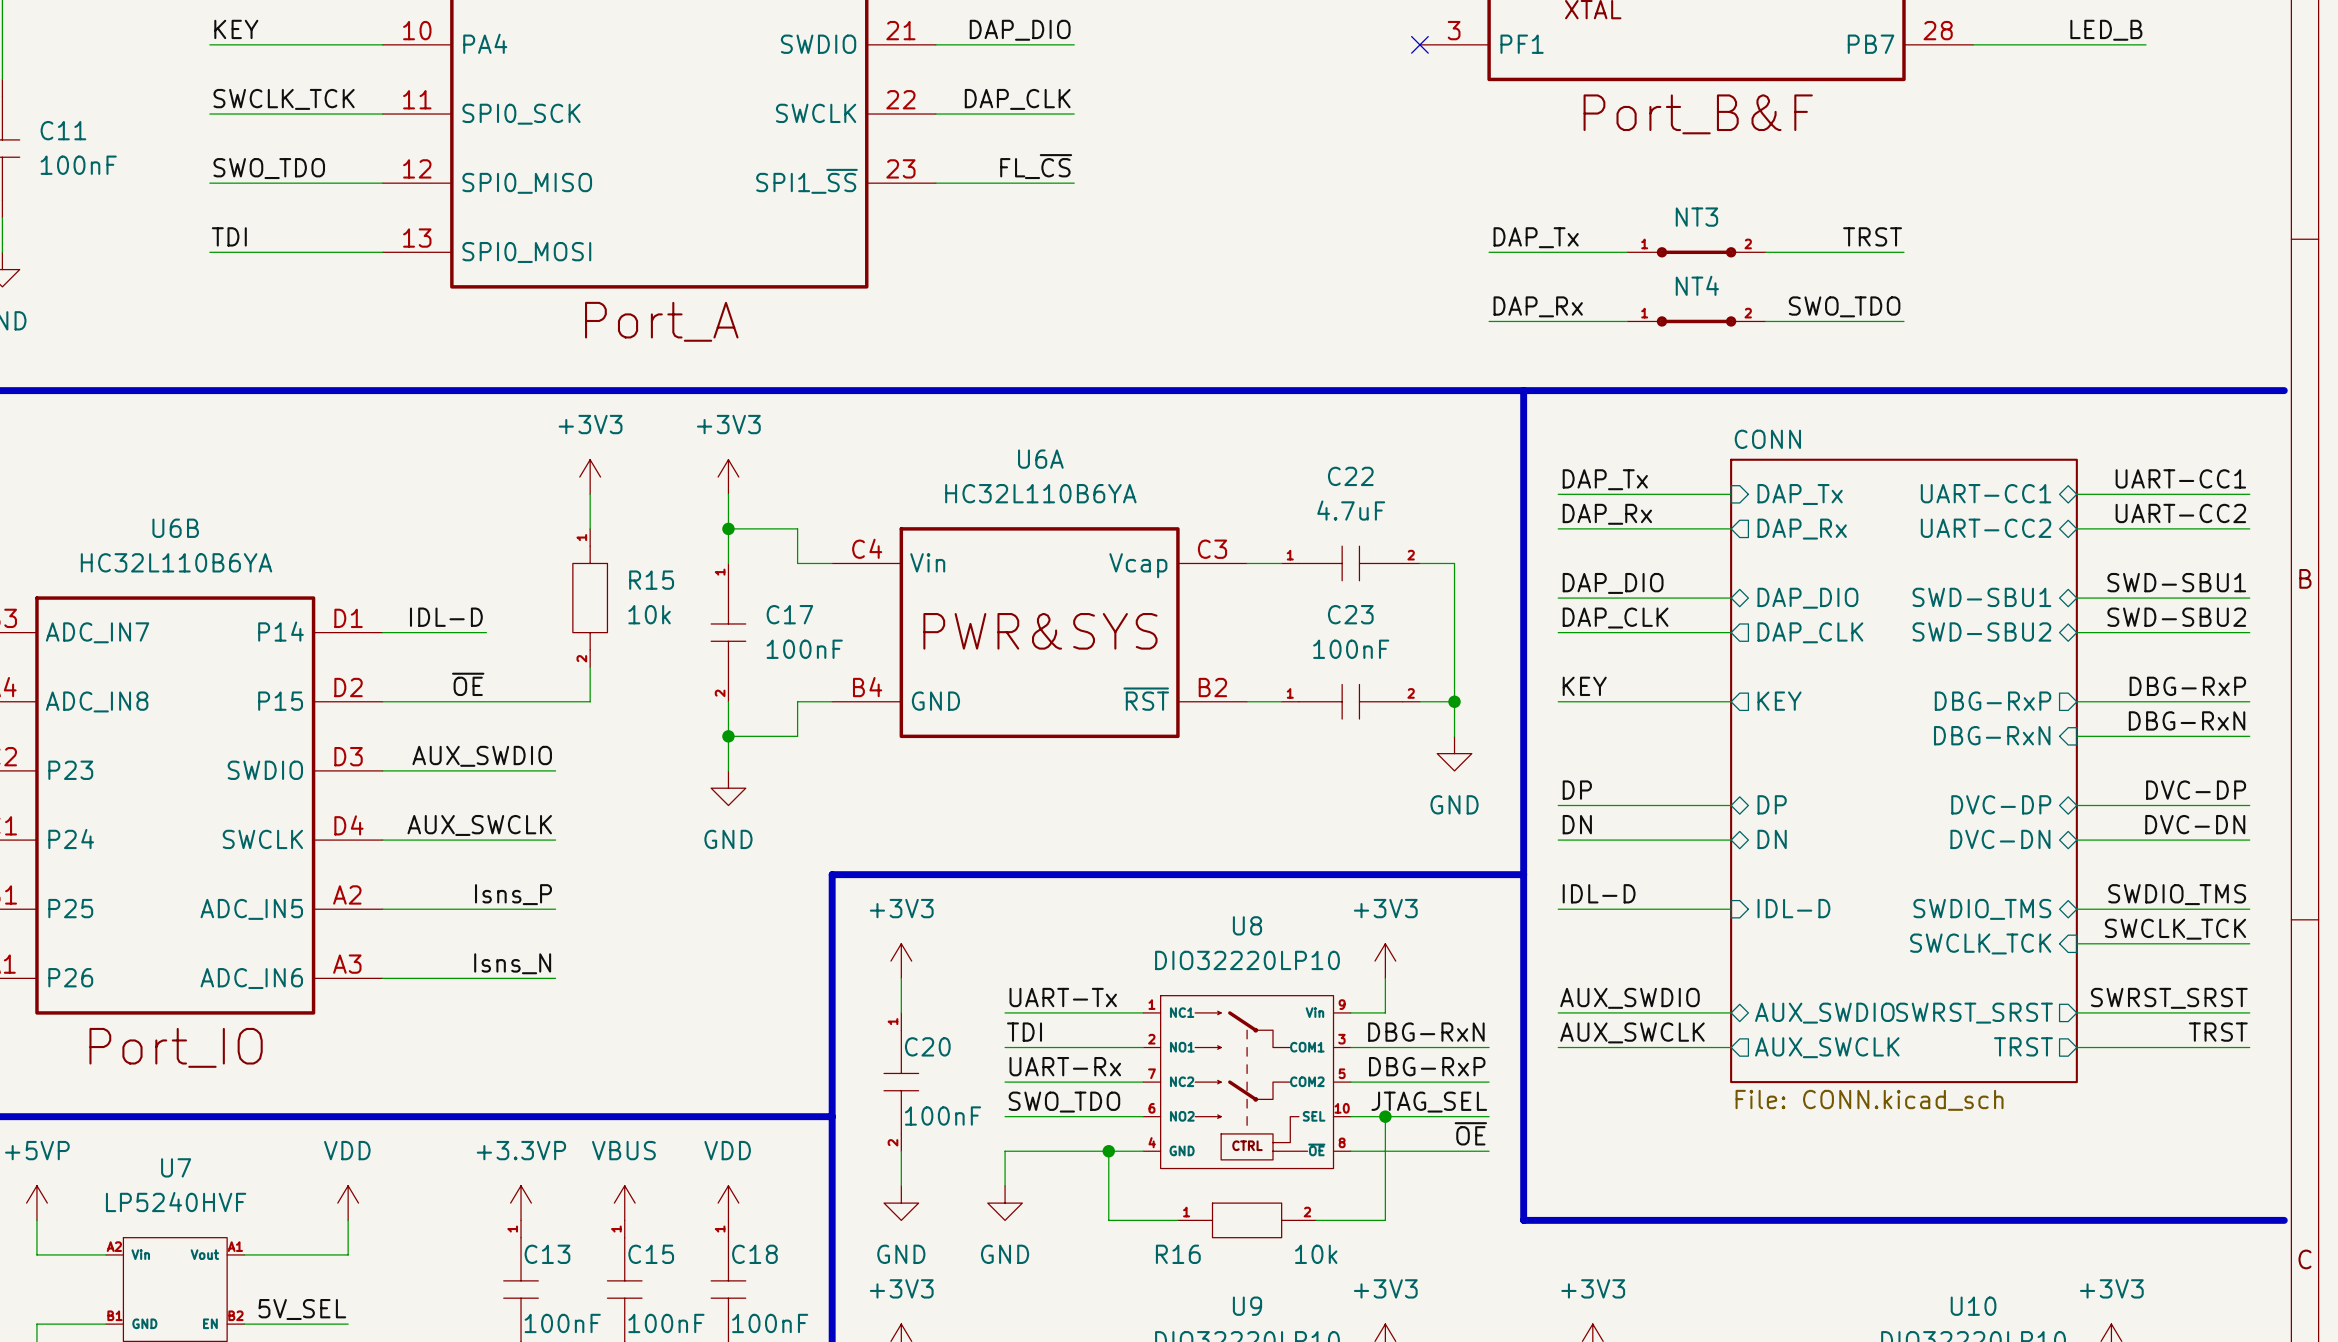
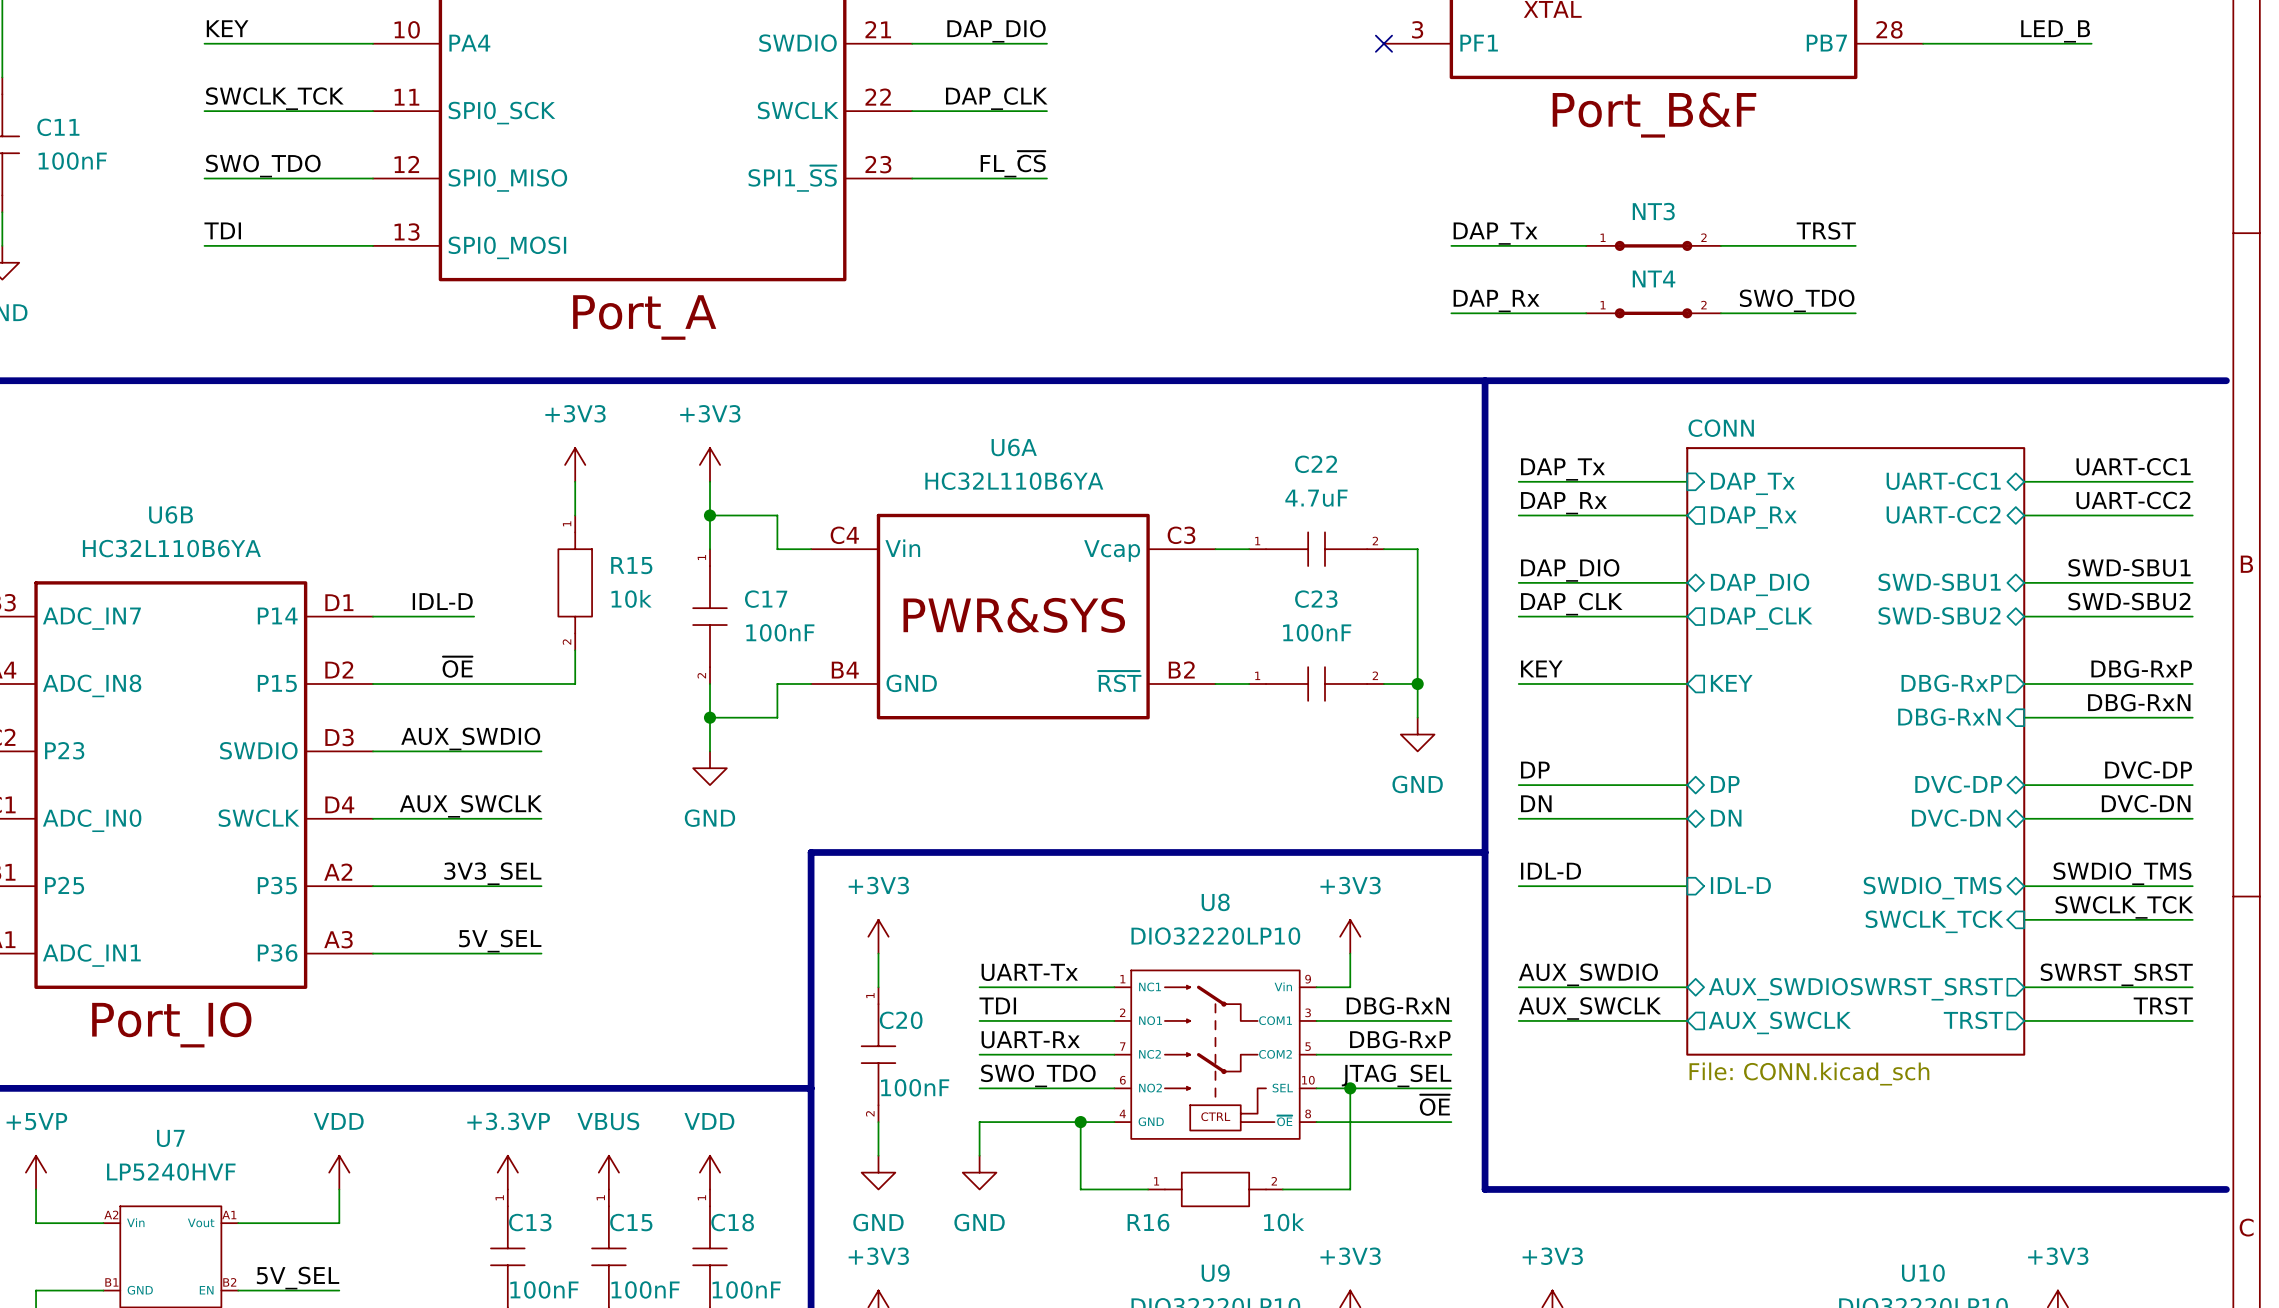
U6B pin name: P24 (71, 839) -> ADC_IN0 (92, 820)
label: Isns_P (513, 894) -> 3V3_SEL (492, 873)
U6B pin name: ADC_IN5 (251, 909) -> P35 (277, 885)
label: Isns_N (512, 963) -> 5V_SEL (500, 941)
U6B pin name: P26 (70, 977) -> ADC_IN1 (91, 955)
U6B pin name: ADC_IN6 (251, 978) -> P36 (277, 952)

